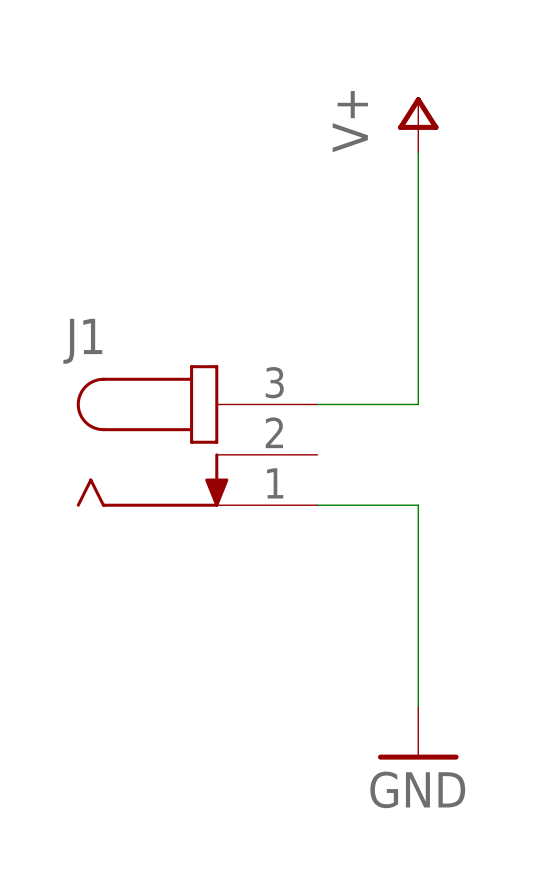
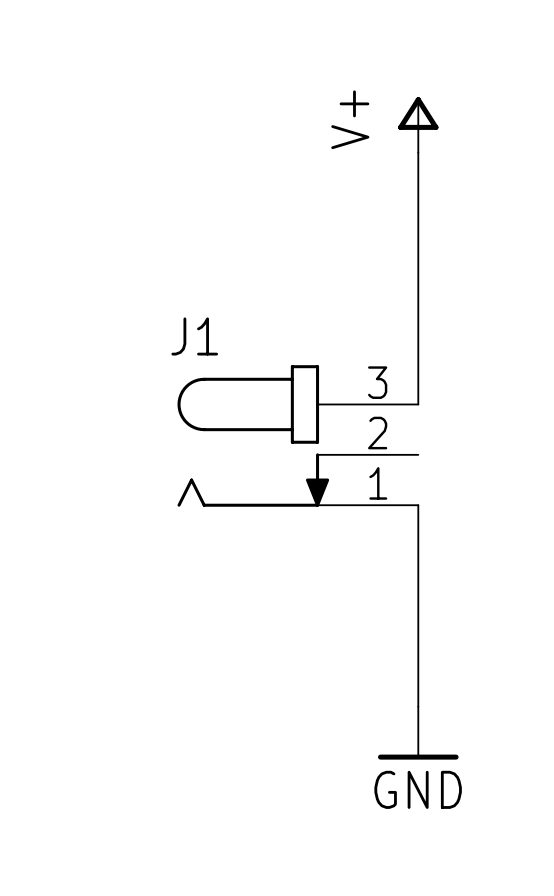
J1 position: (197, 435) -> (297, 435)

